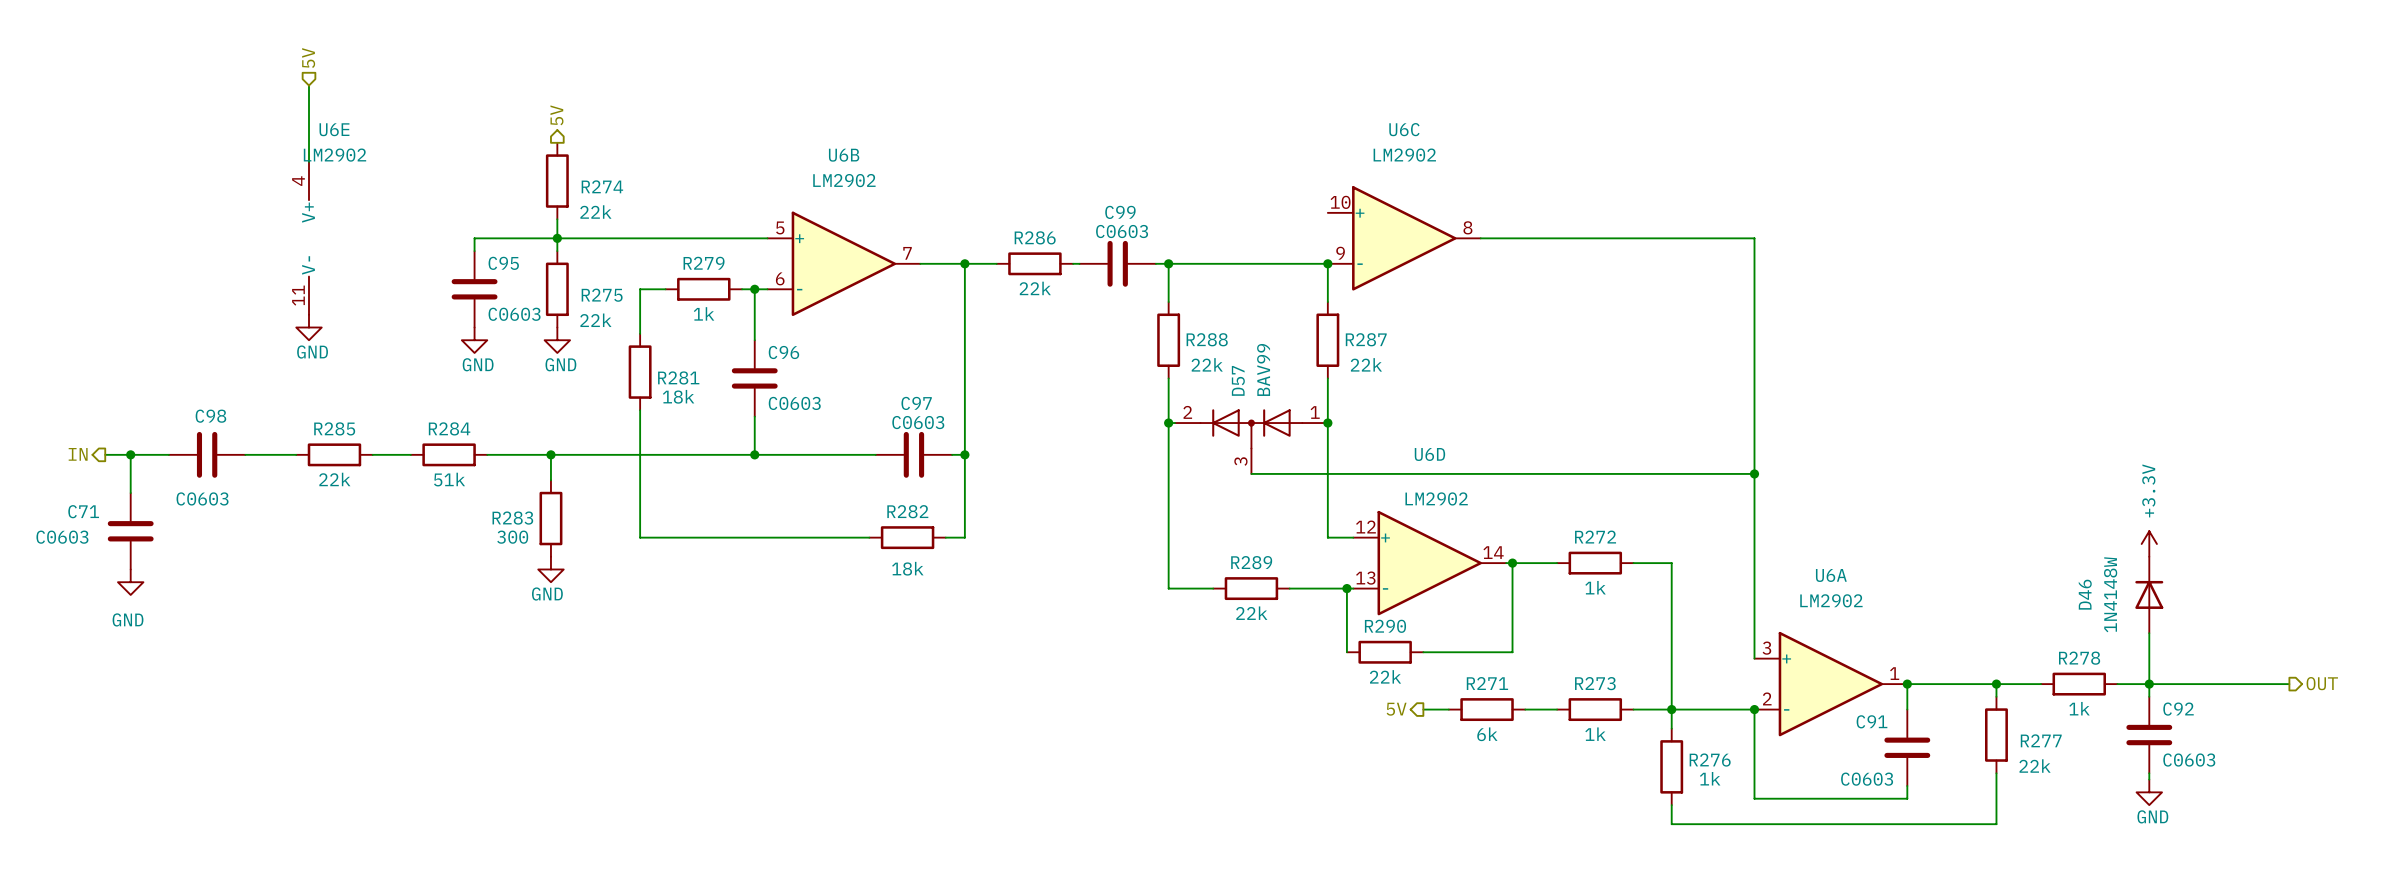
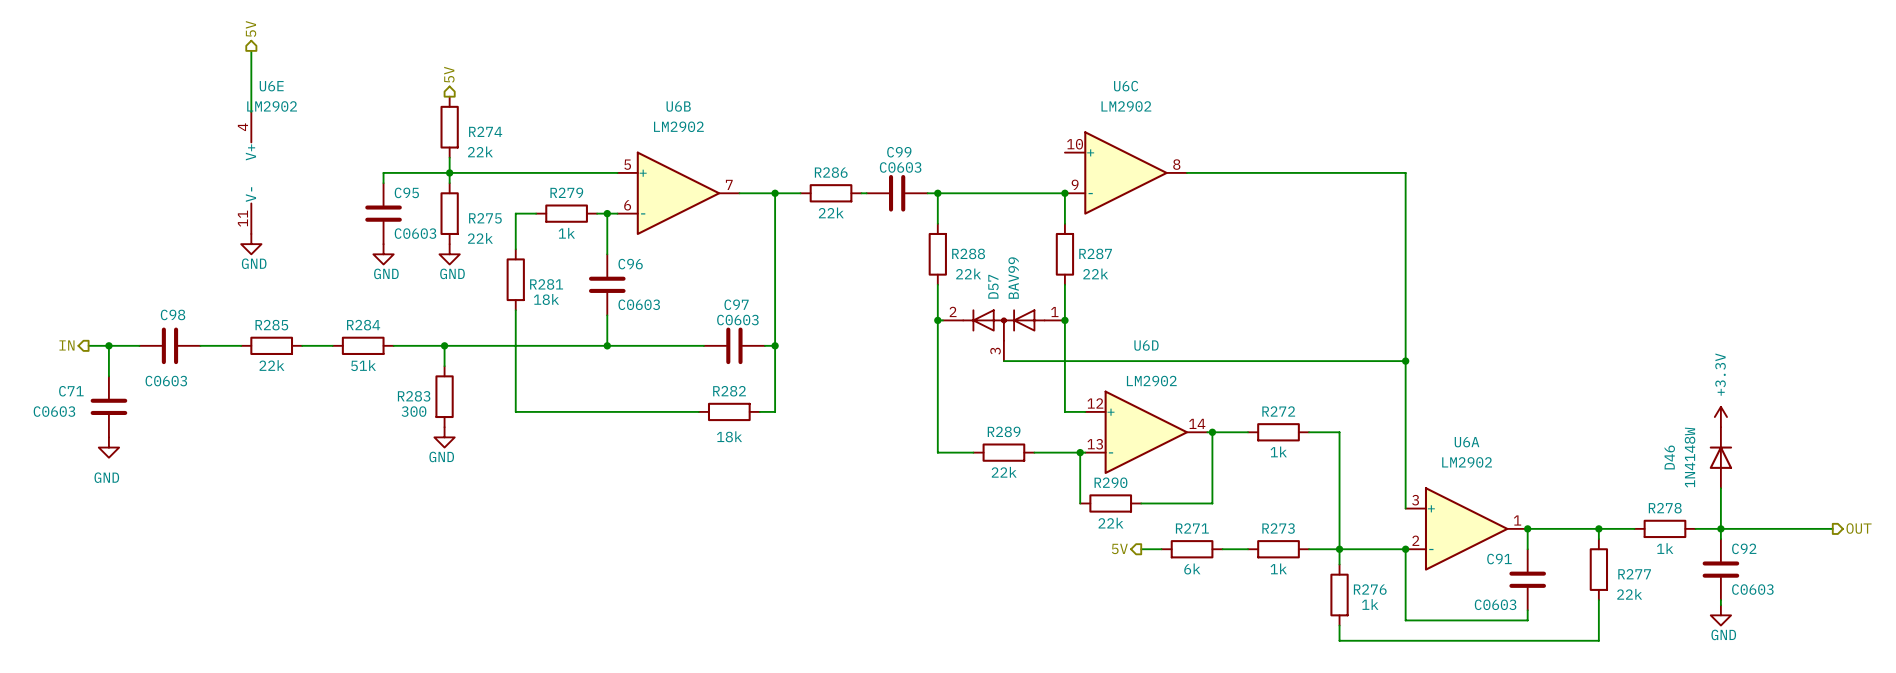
hierarchical label shape: input (308, 58) -> output (251, 28)

